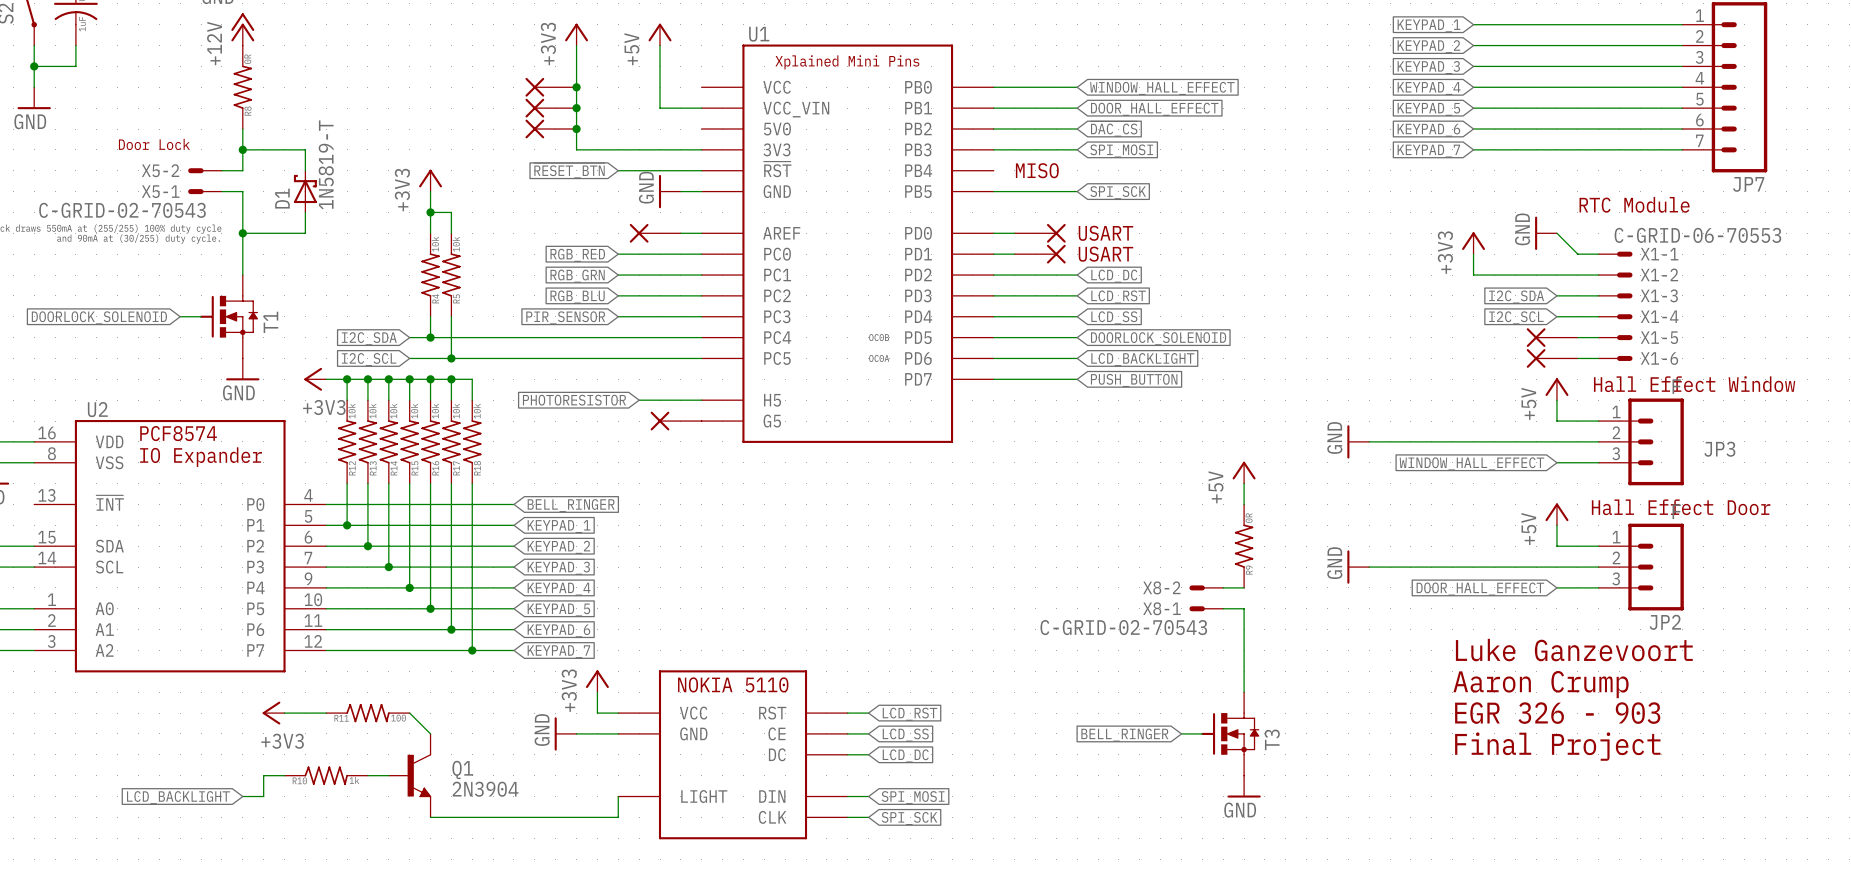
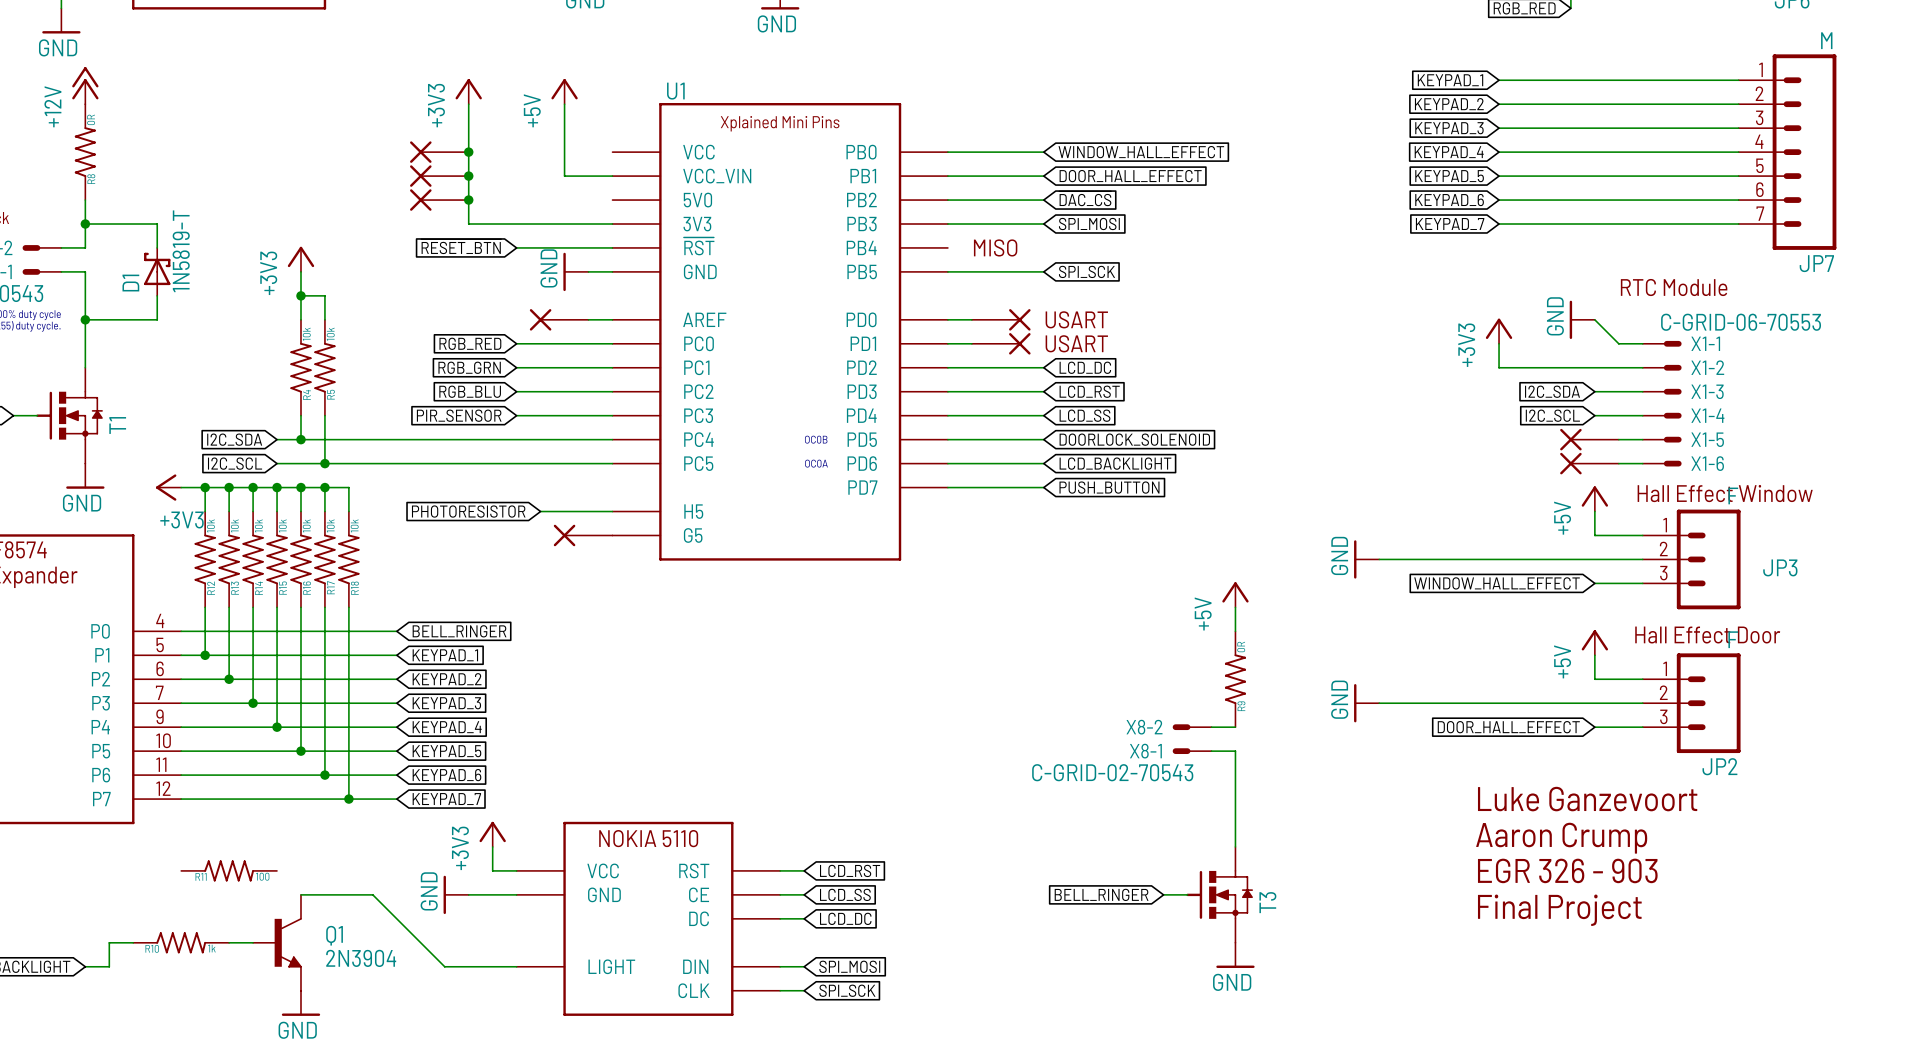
power symbol: +3V3 (273, 713) -> none
wire: (284, 713) (326, 713) -> none
wire: (409, 713) (430, 733) -> none
wire: (618, 796) (618, 817) (430, 817) -> (516, 966) (444, 966) (372, 894) (300, 894)
power symbol: none -> GND (300, 1003)

